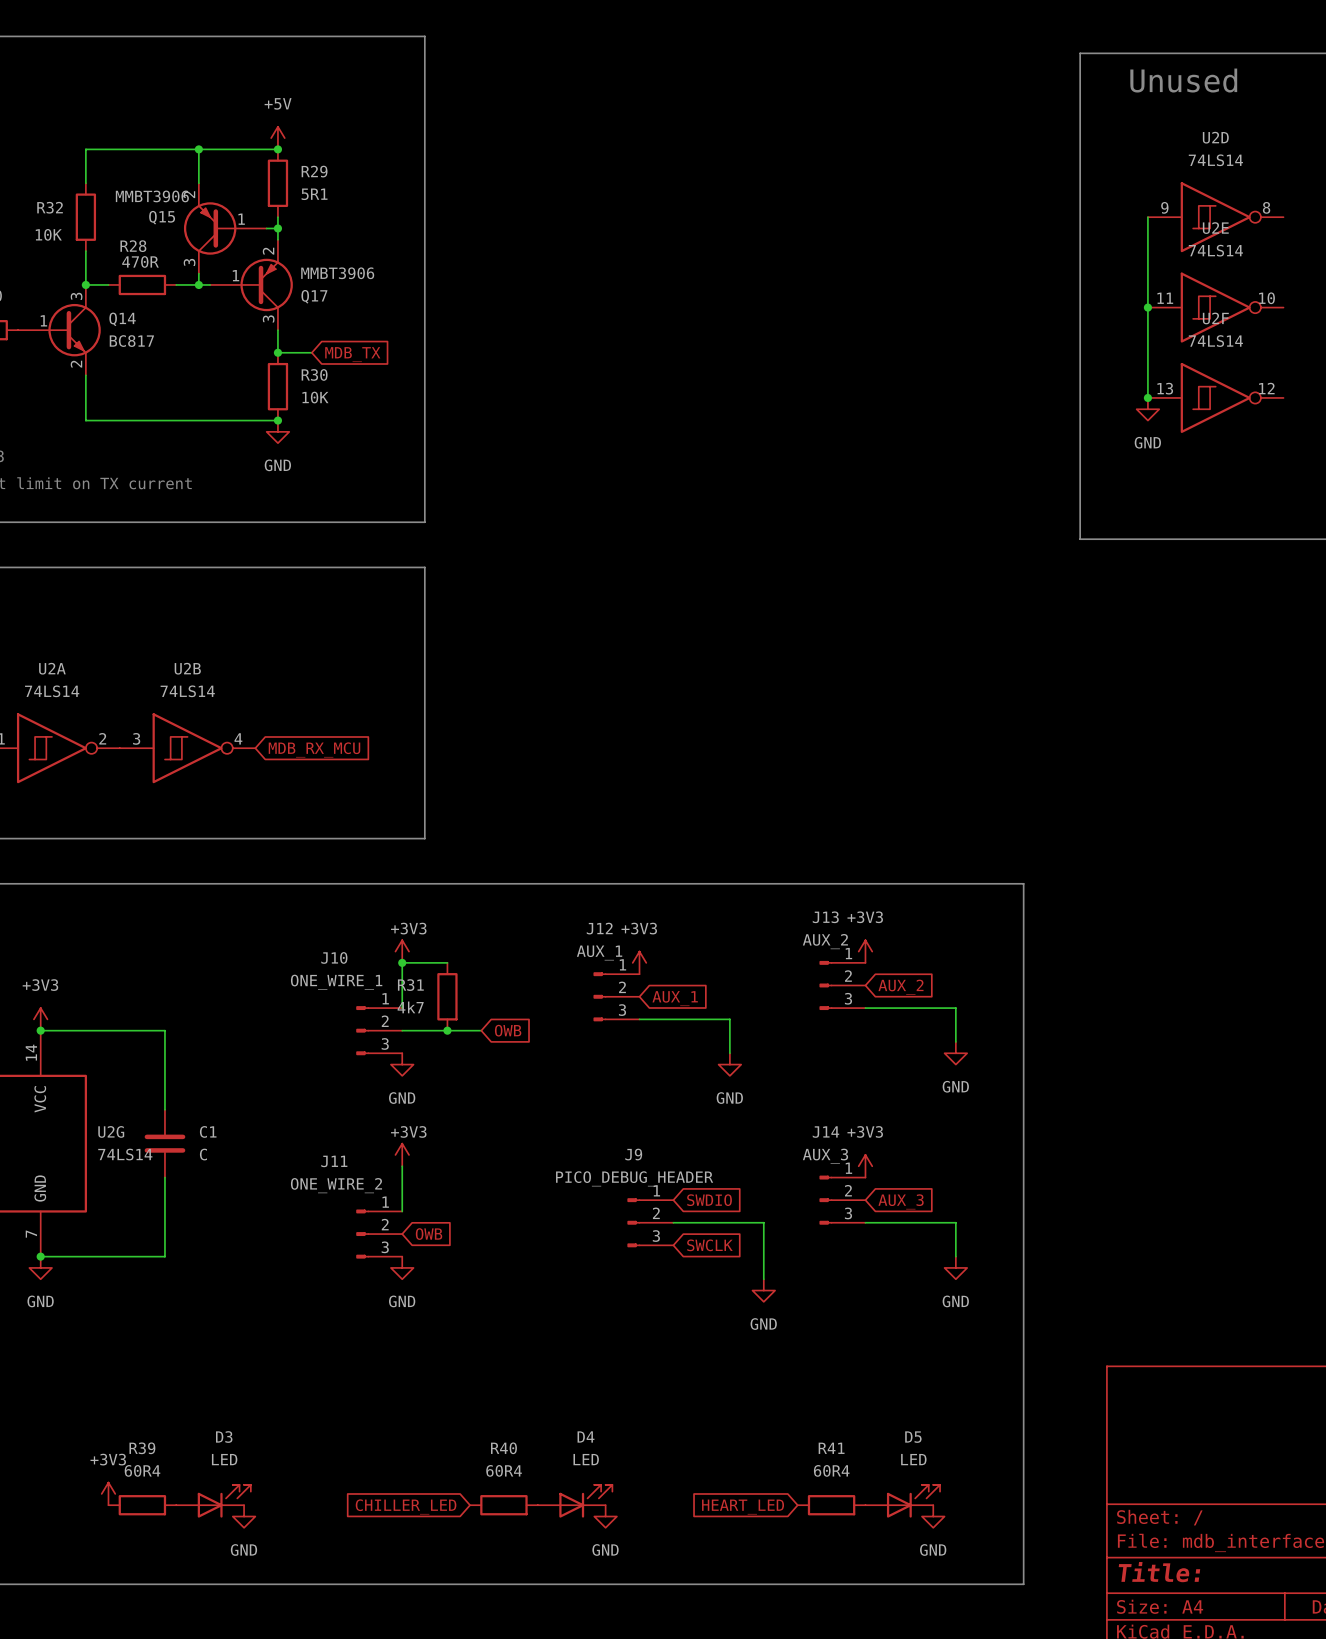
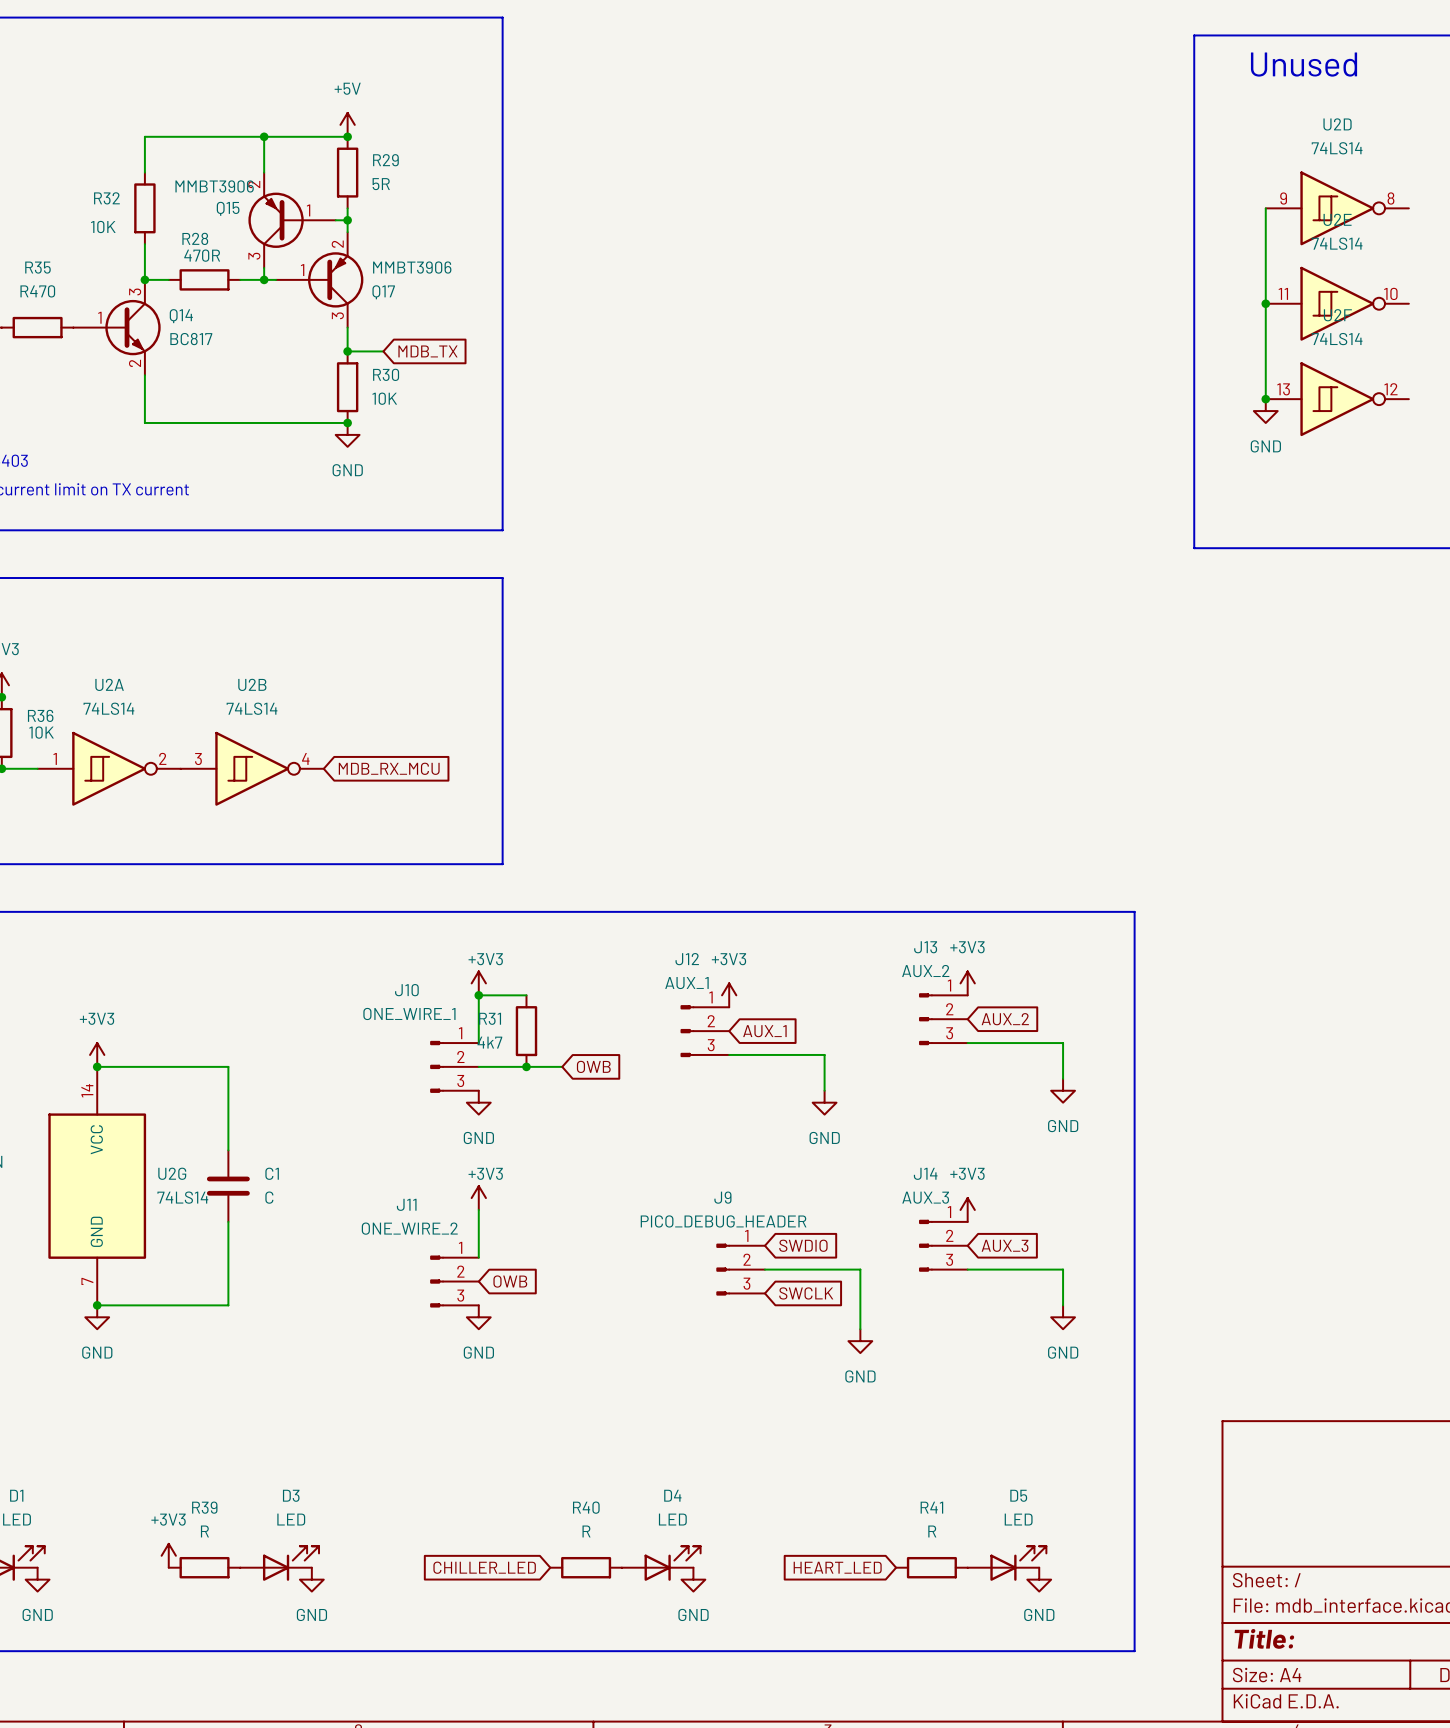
R29 value: 5R1 (314, 194) -> 5R (381, 184)
R39 value: 60R4 (142, 1470) -> R (204, 1531)
R40 value: 60R4 (504, 1470) -> R (586, 1531)
R41 value: 60R4 (831, 1470) -> R (932, 1531)

